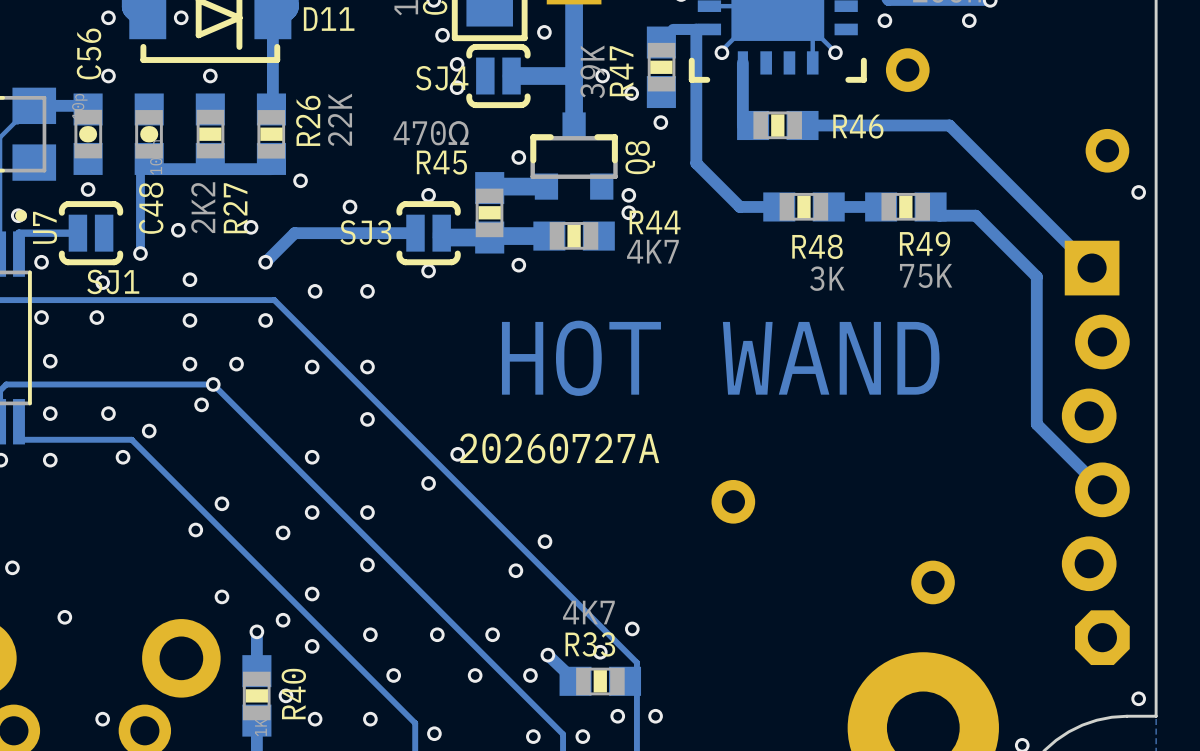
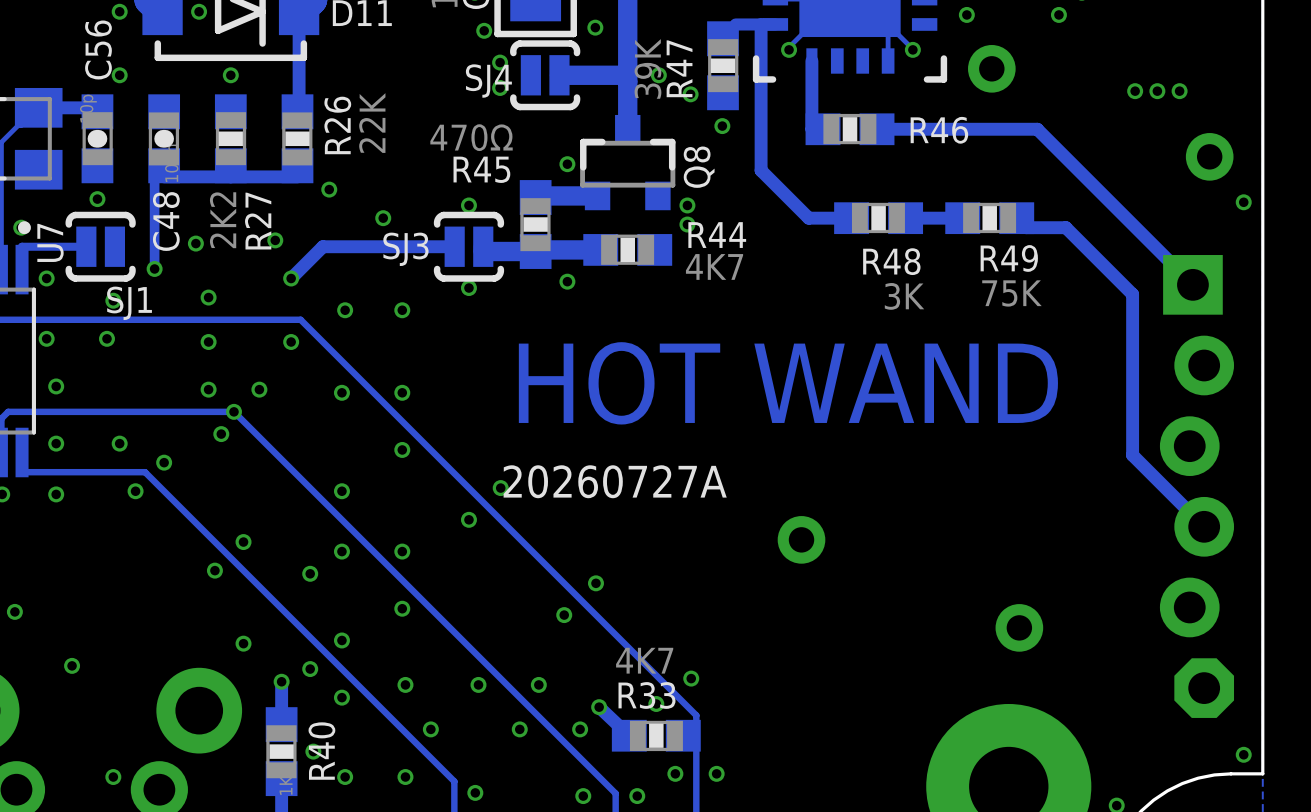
via: none -> (1135, 91)
via: none -> (1157, 91)
via: none -> (1179, 91)

